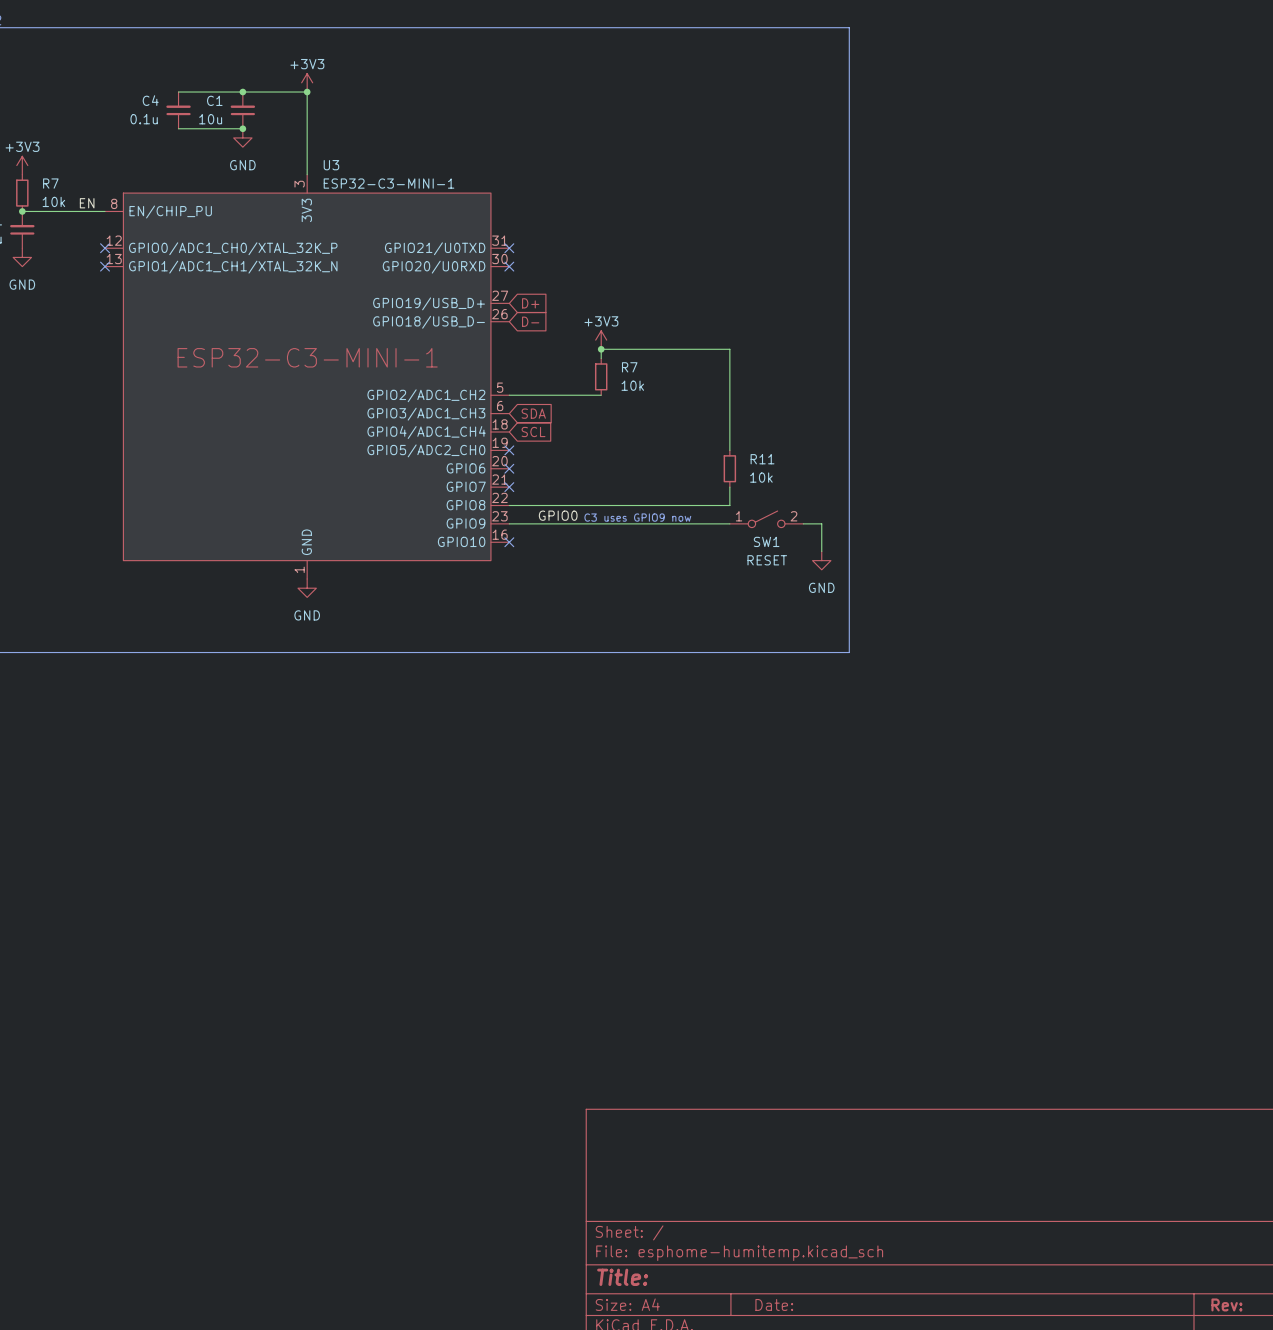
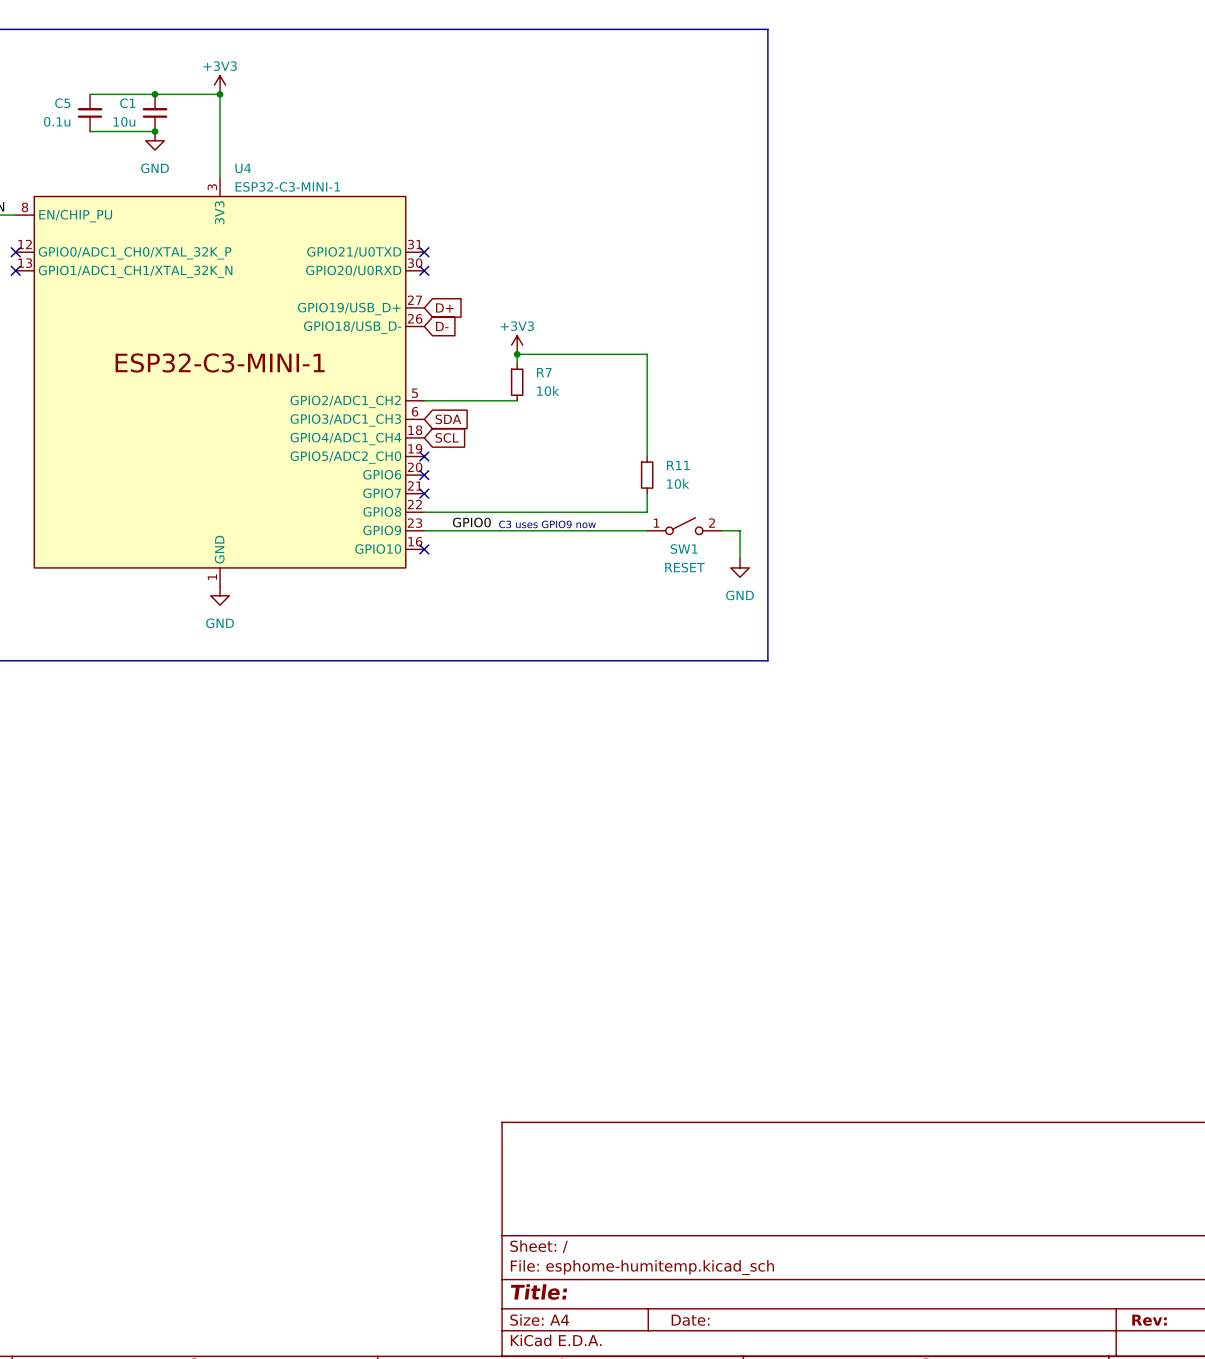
C4 name: C4 (150, 100) -> C5 (62, 103)
U3 name: U3 (331, 165) -> U4 (243, 168)

